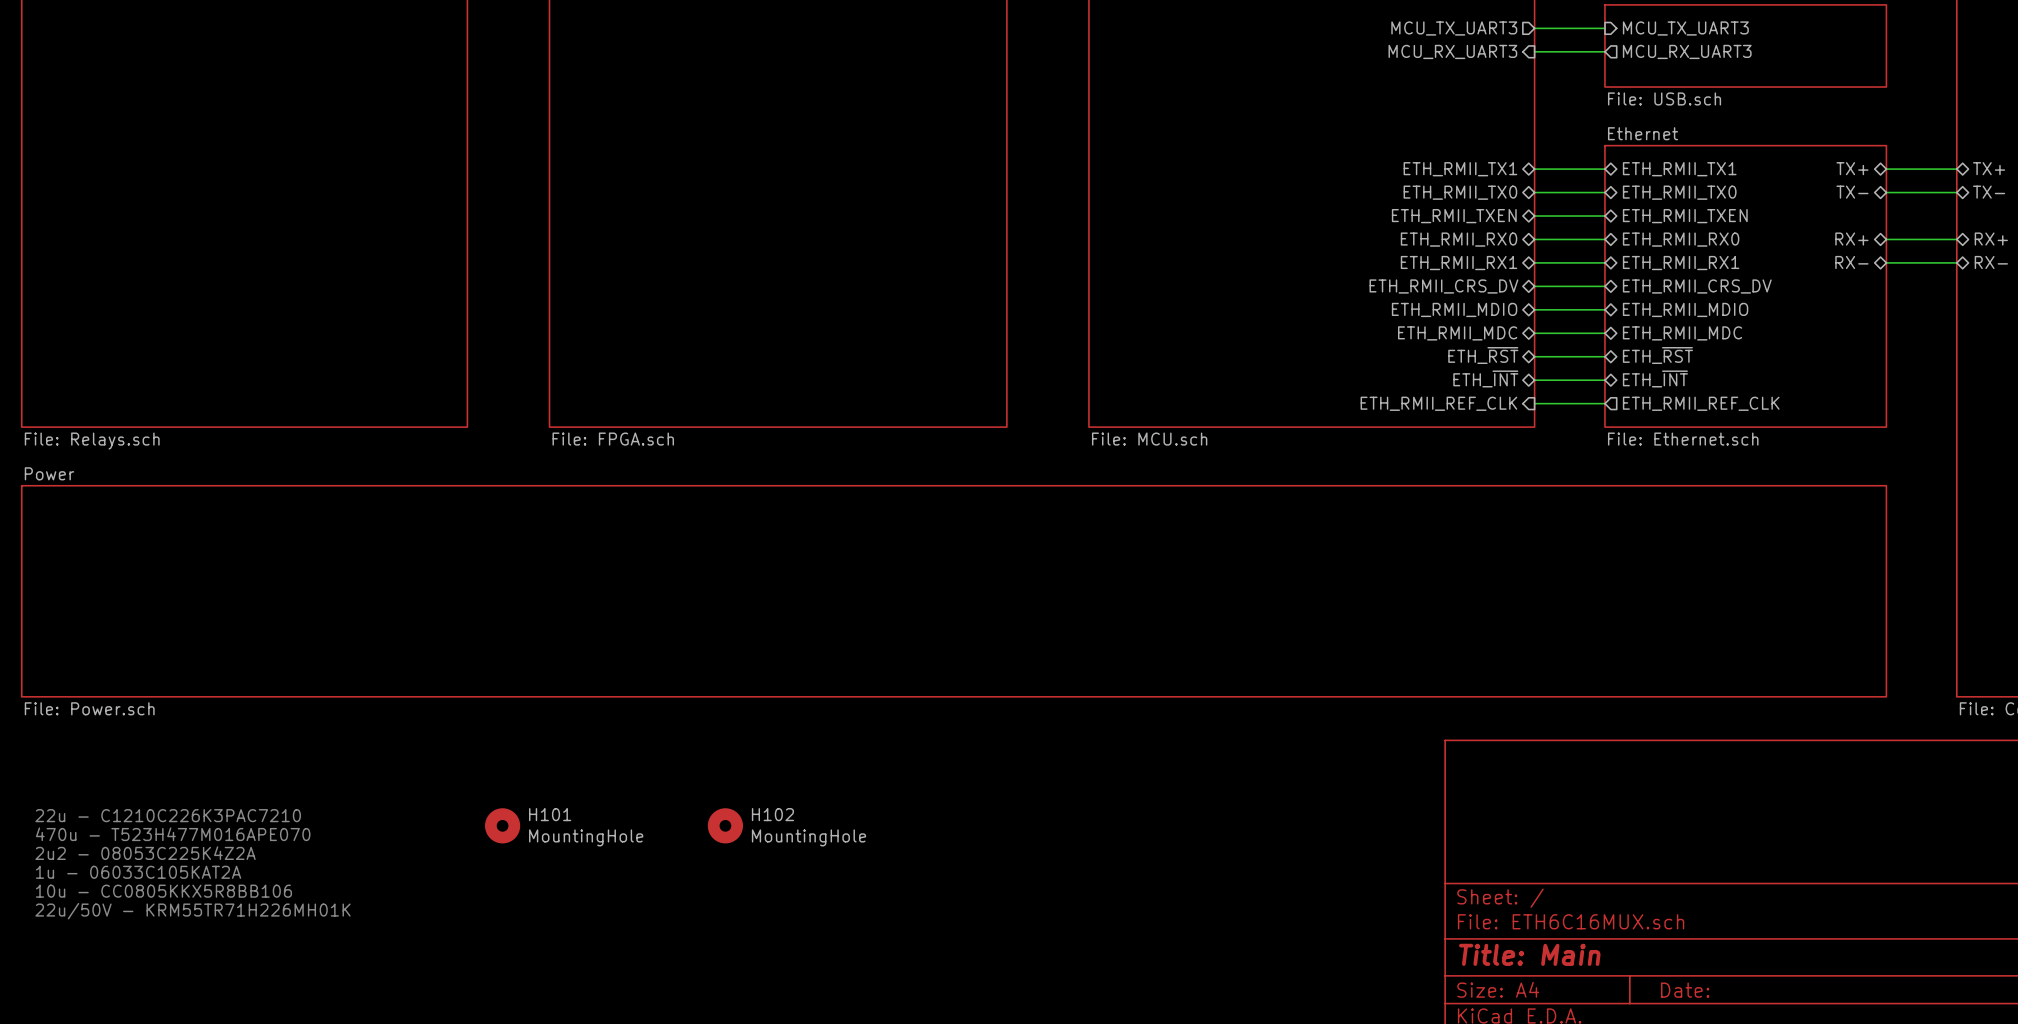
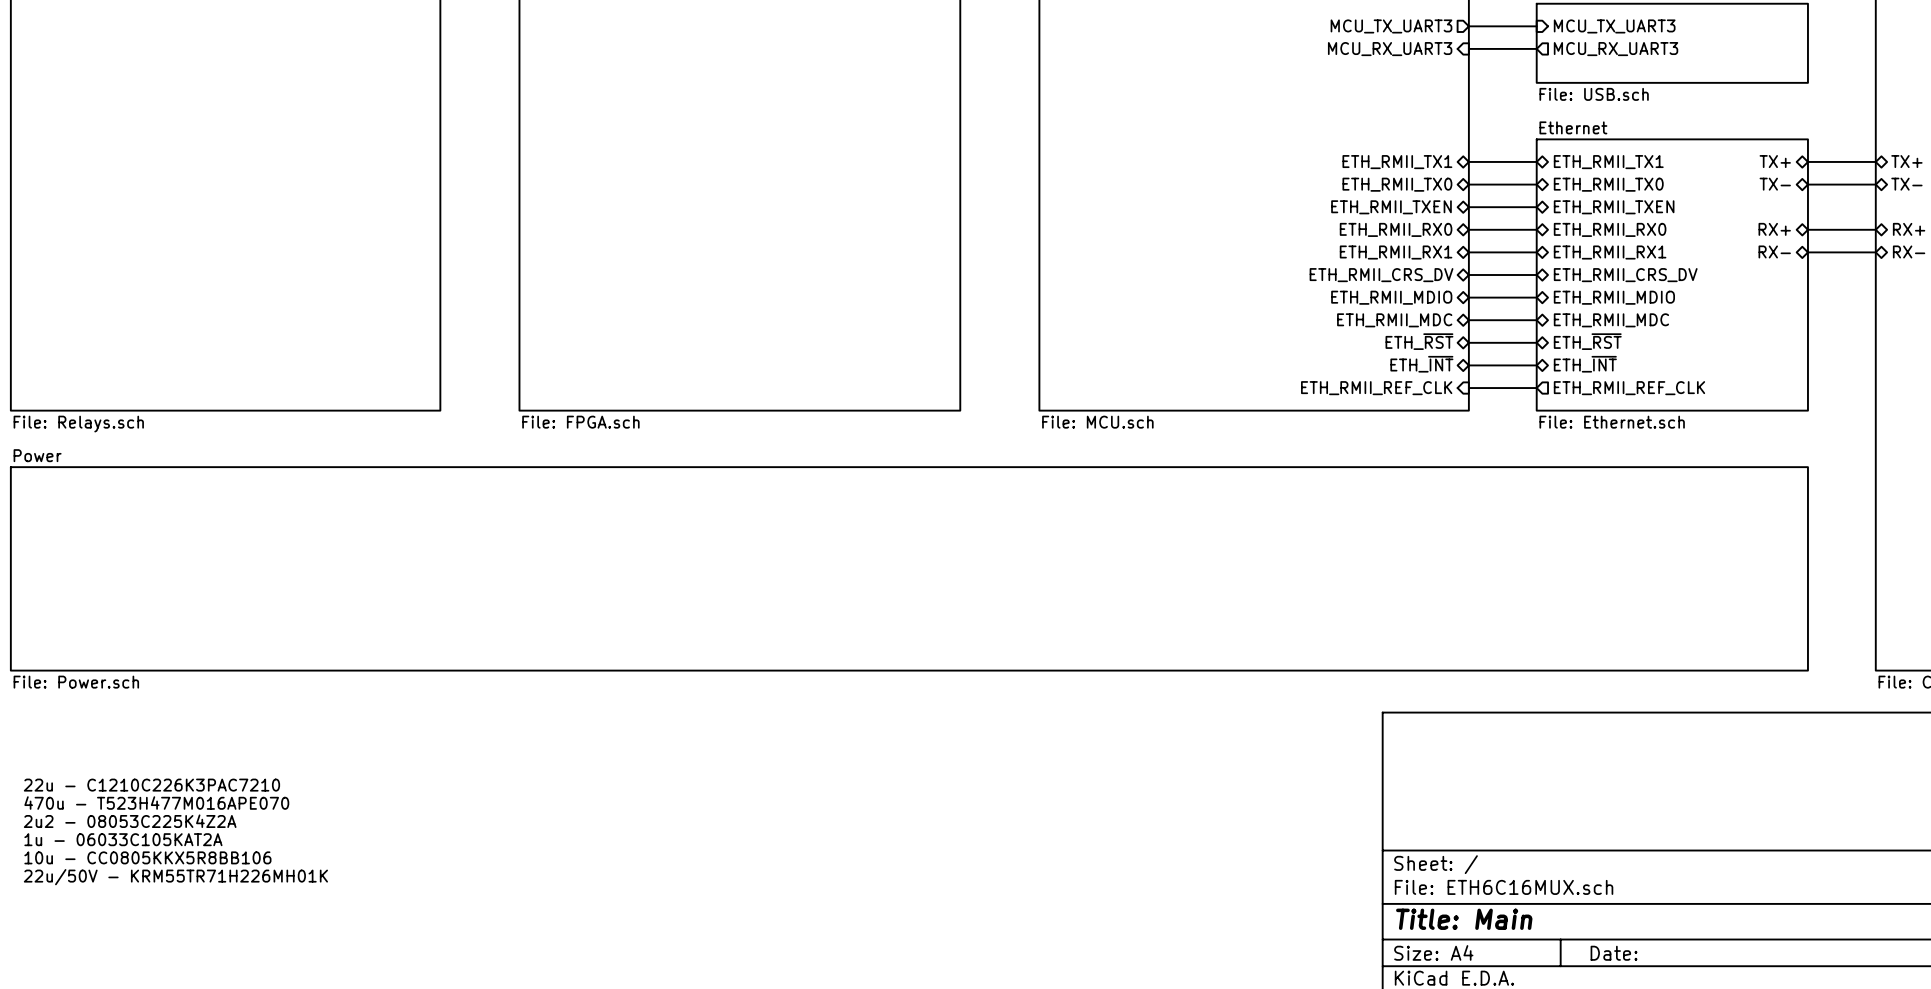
H101: MountingHole (502, 825) -> none
H102: MountingHole (725, 825) -> none

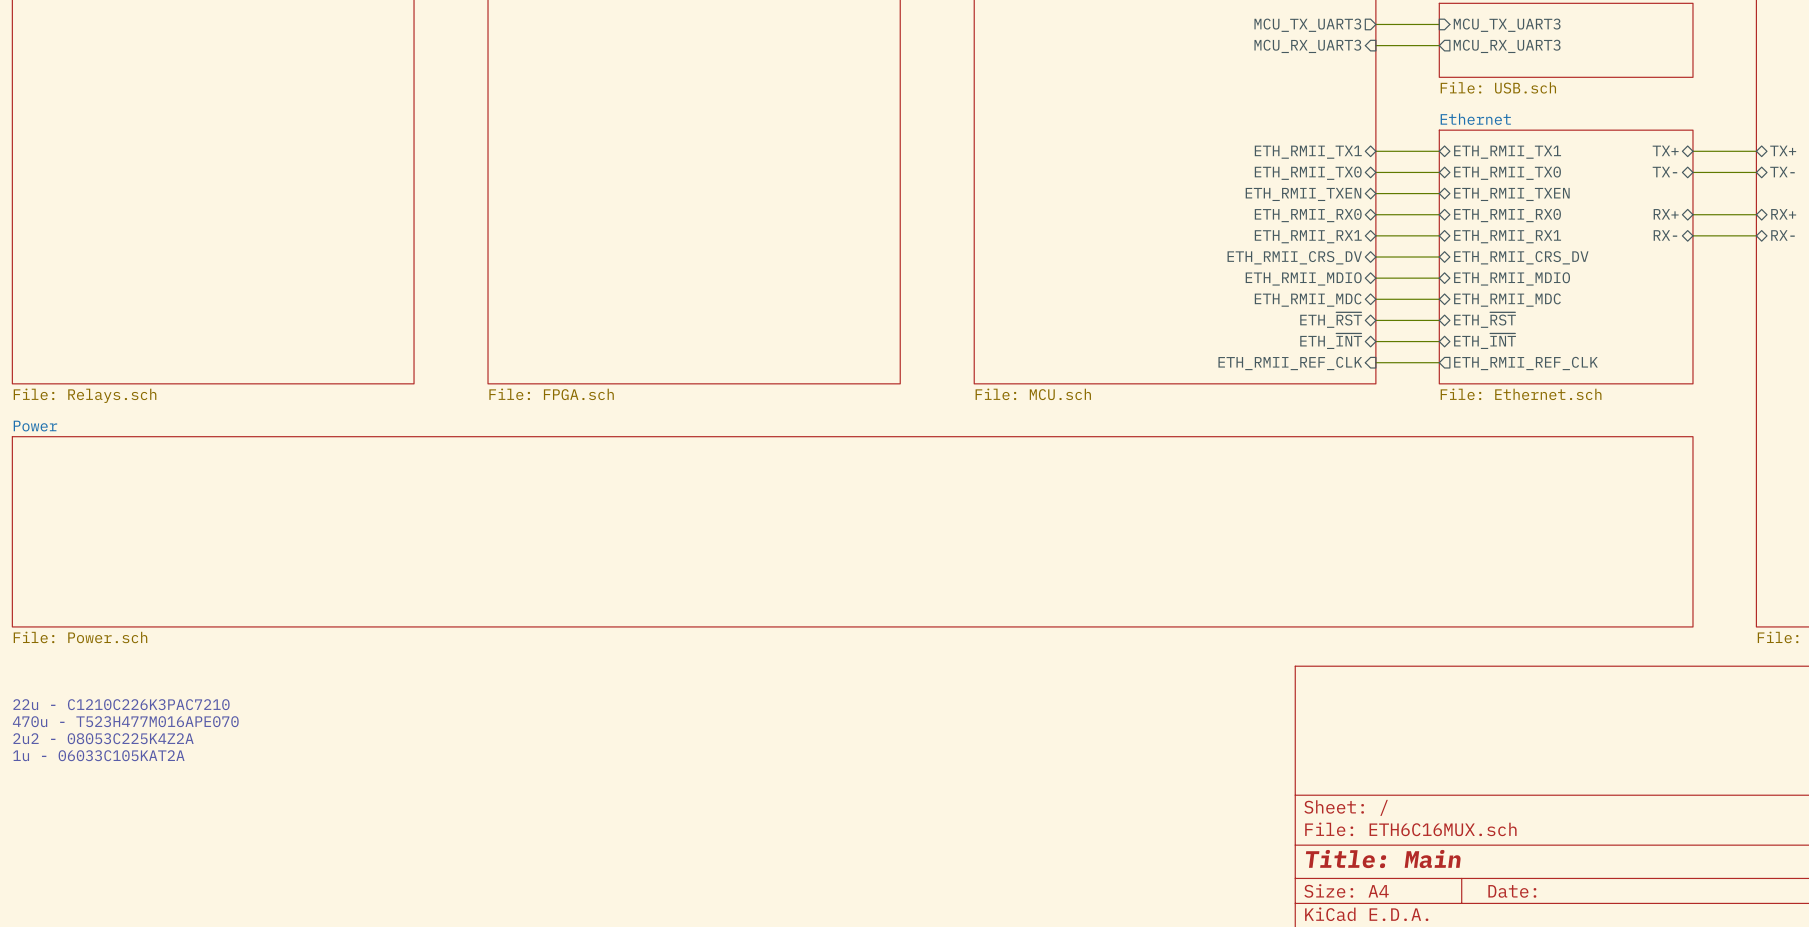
text position: 22u - C1210C226K3PAC7210 (151, 785) -> 22u - C1210C226K3PAC7210 (121, 704)
text position: 470u - T523H477M016APE070 (156, 803) -> 470u - T523H477M016APE070 (125, 721)
text position: 2u2 - 08053C225K4Z2A (130, 821) -> 2u2 - 08053C225K4Z2A (103, 738)
text position: 1u - 06033C105KAT2A (123, 839) -> 1u - 06033C105KAT2A (98, 755)
text: 10u - CC0805KKX5R8BB106 (147, 857) -> none
text: 22u/50V - KRM55TR71H226MH01K (175, 877) -> none

